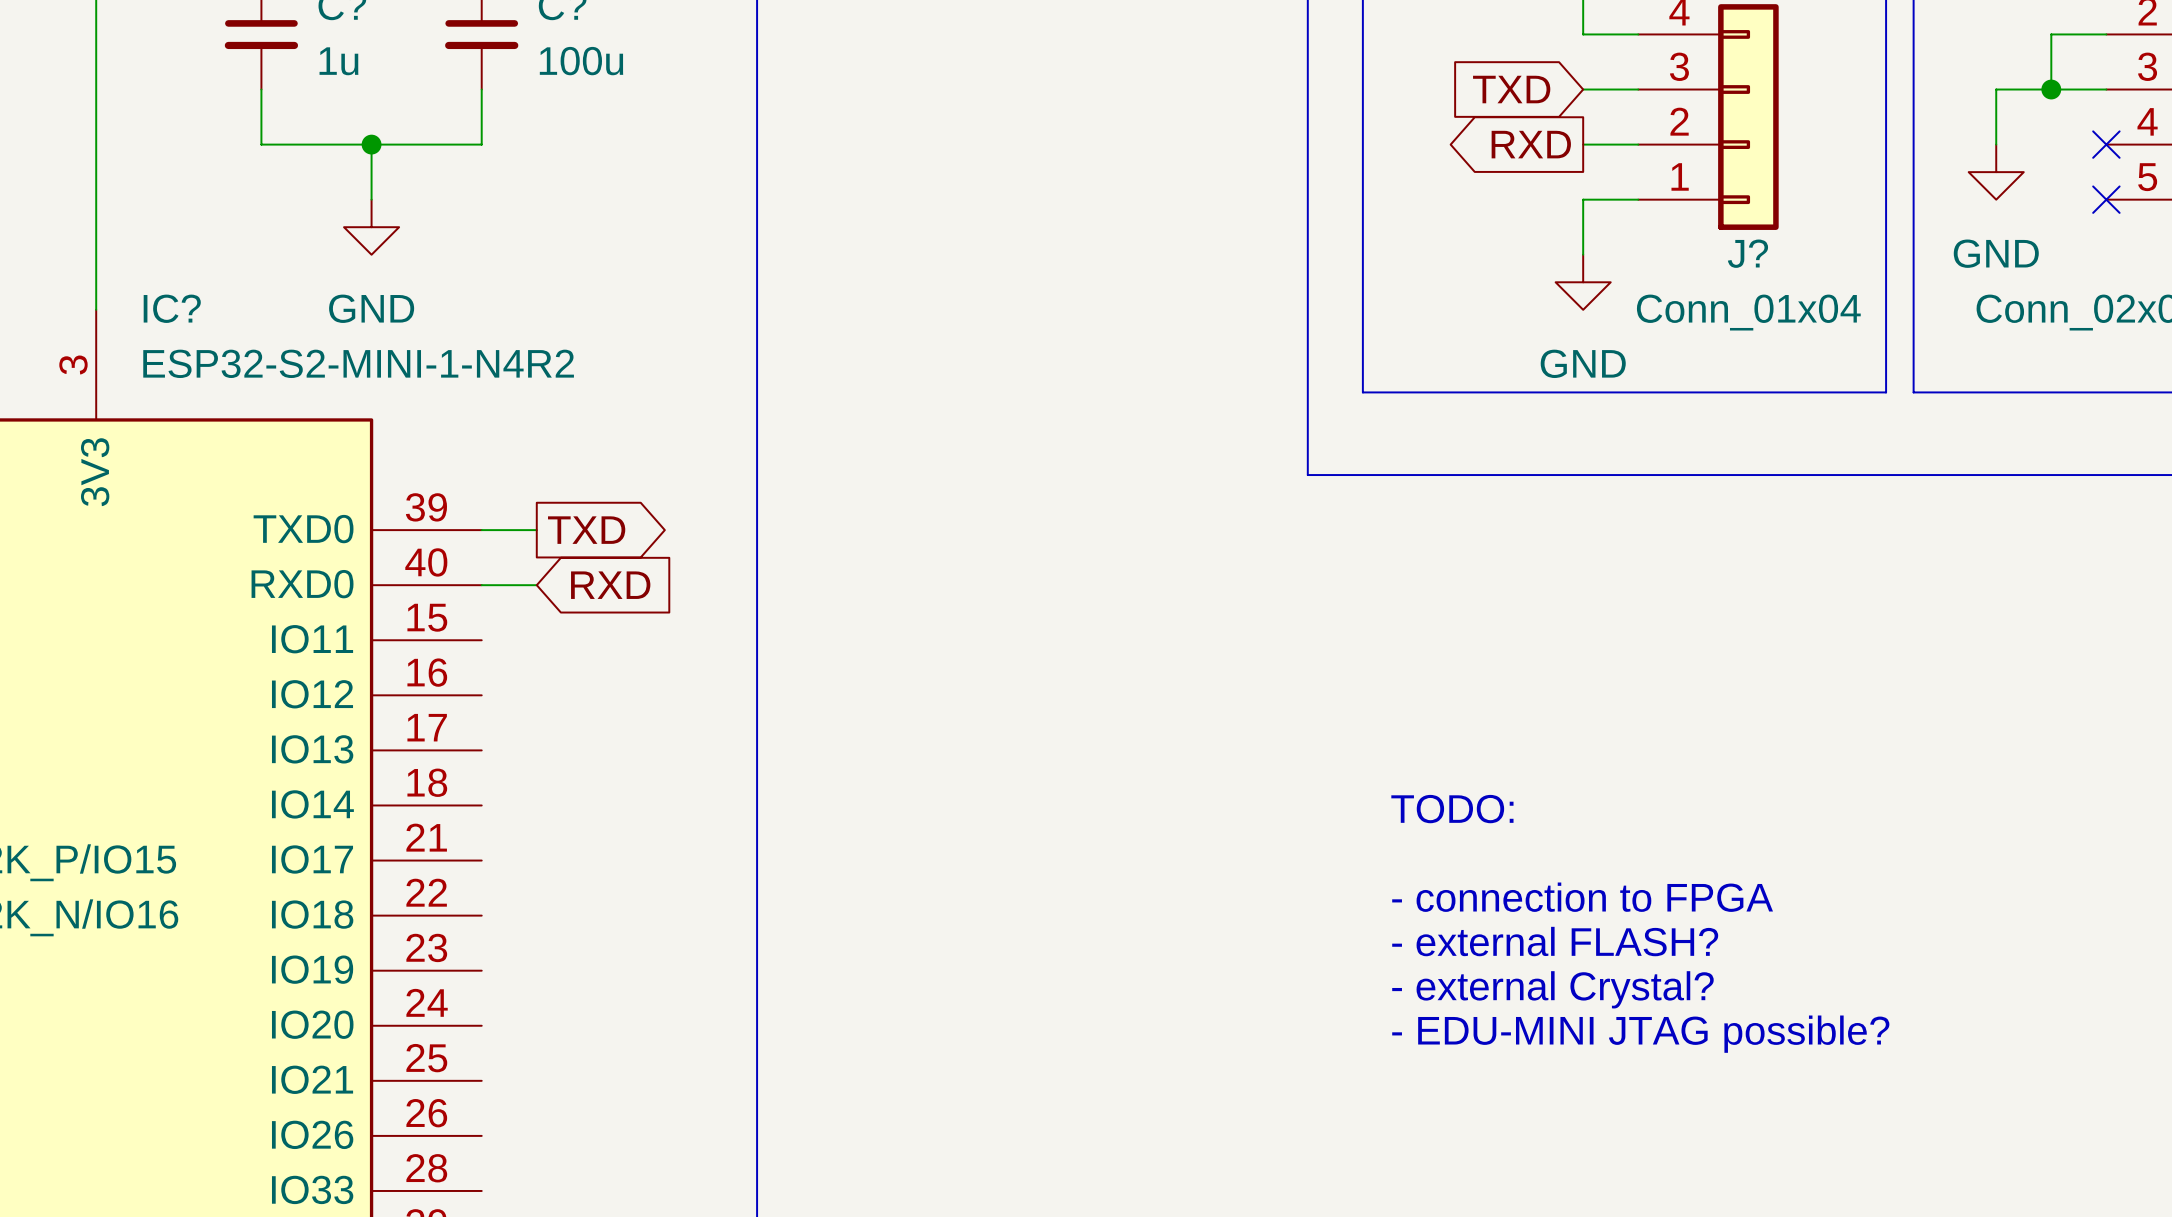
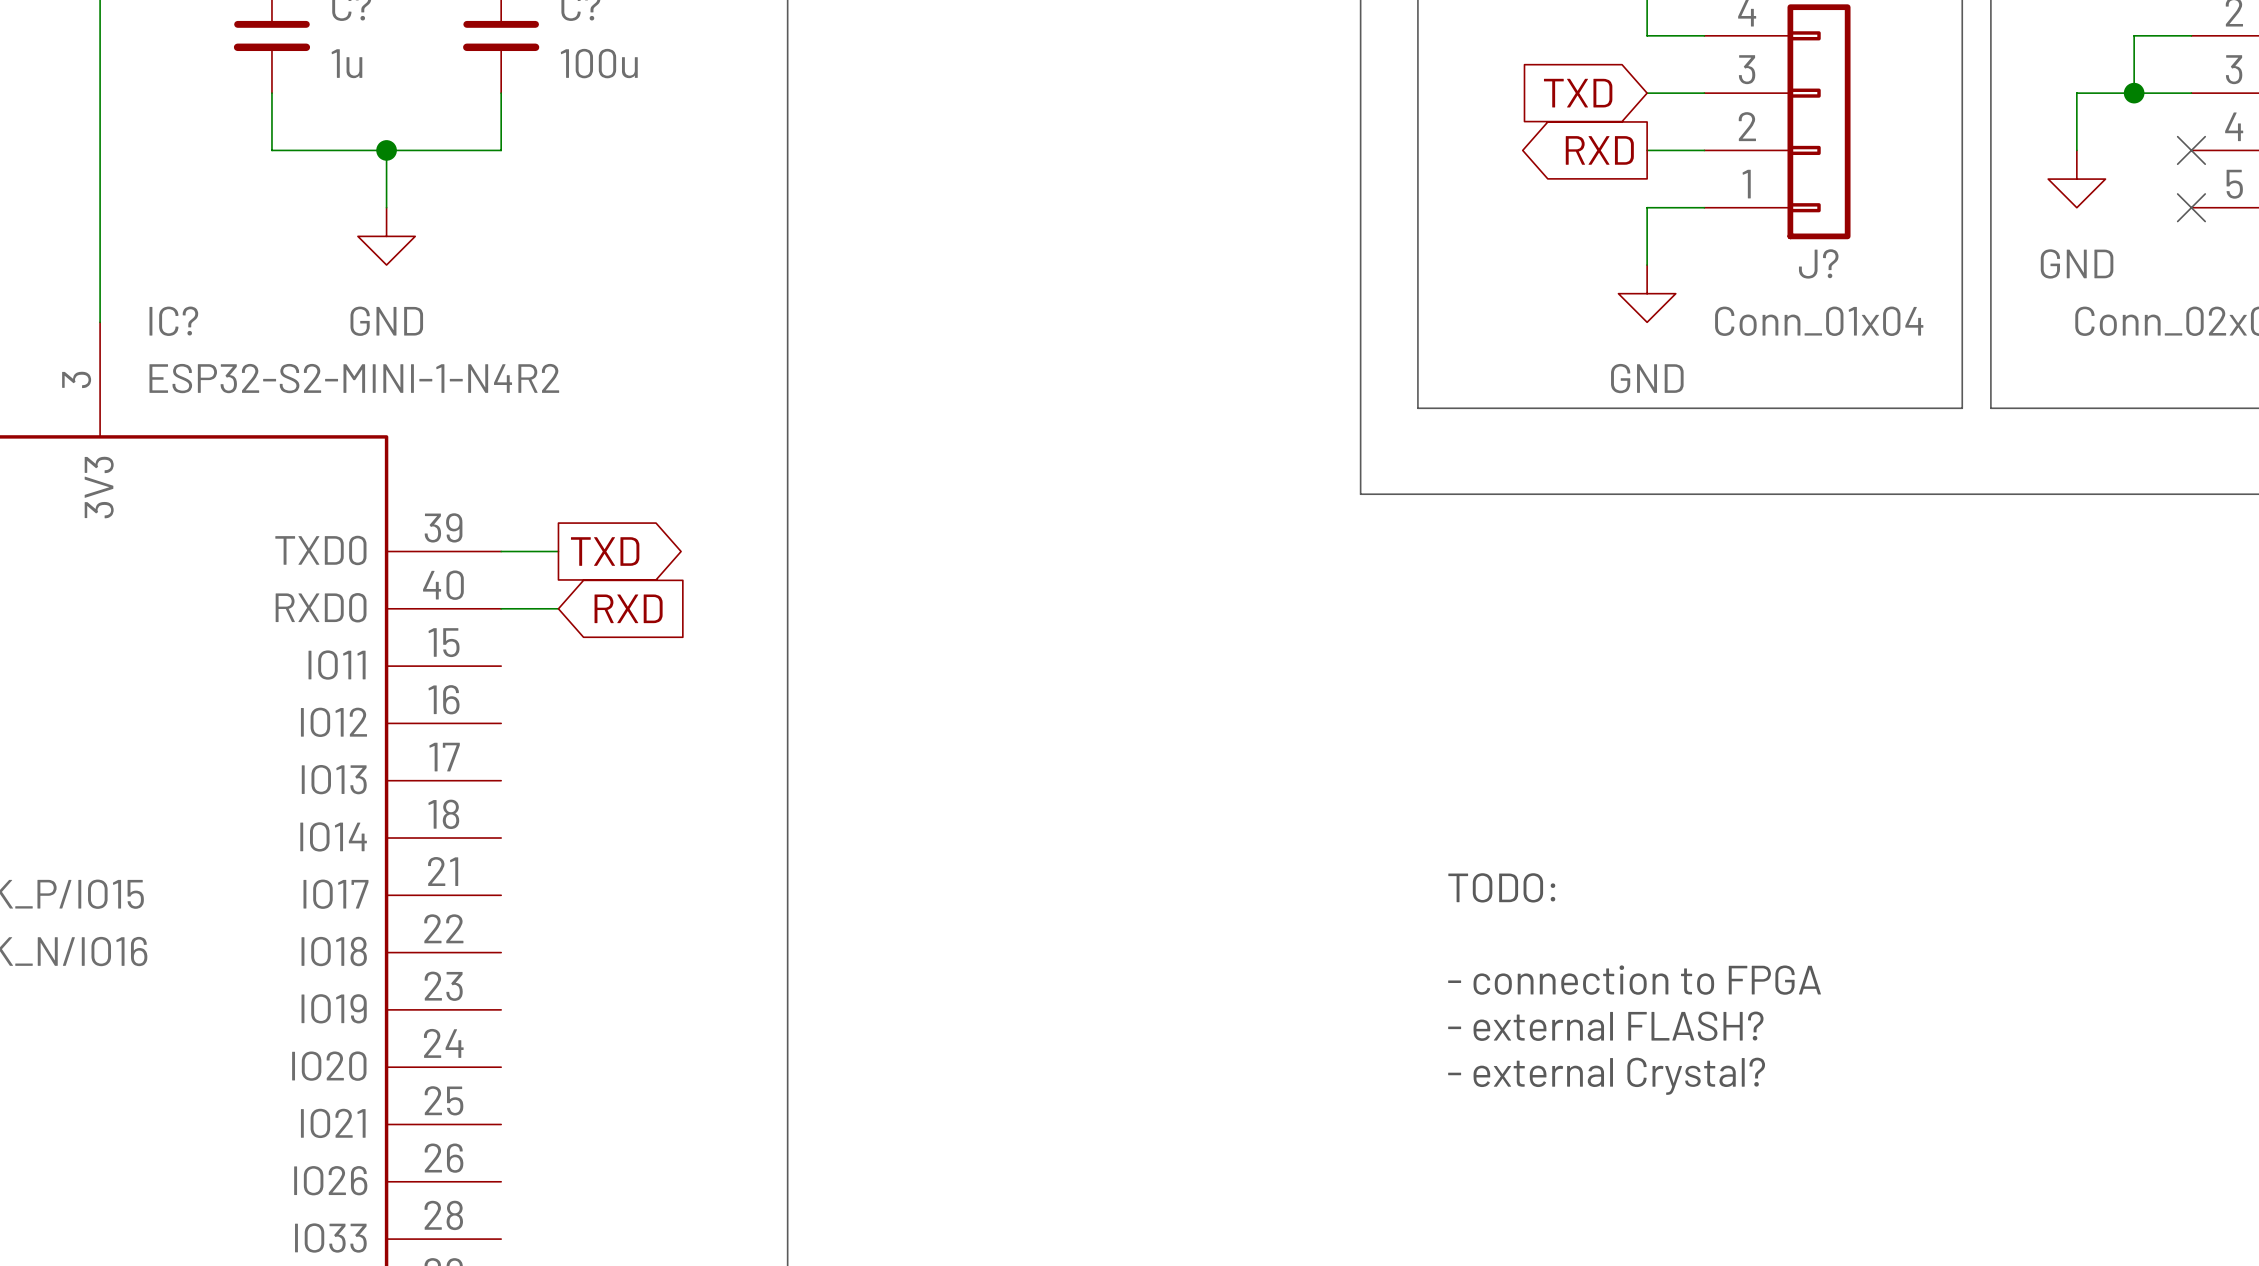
text position: TODO: (1452, 809) -> TODO: (1501, 887)
text: - connection to FPGA (1582, 897) -> none
text: - external FLASH? (1555, 941) -> - connection to FPGA (1634, 980)
text: - external Crystal? (1552, 989) -> - external FLASH? (1605, 1026)
text: - EDU-MINI JTAG possible? (1640, 1034) -> - external Crystal? (1606, 1076)

